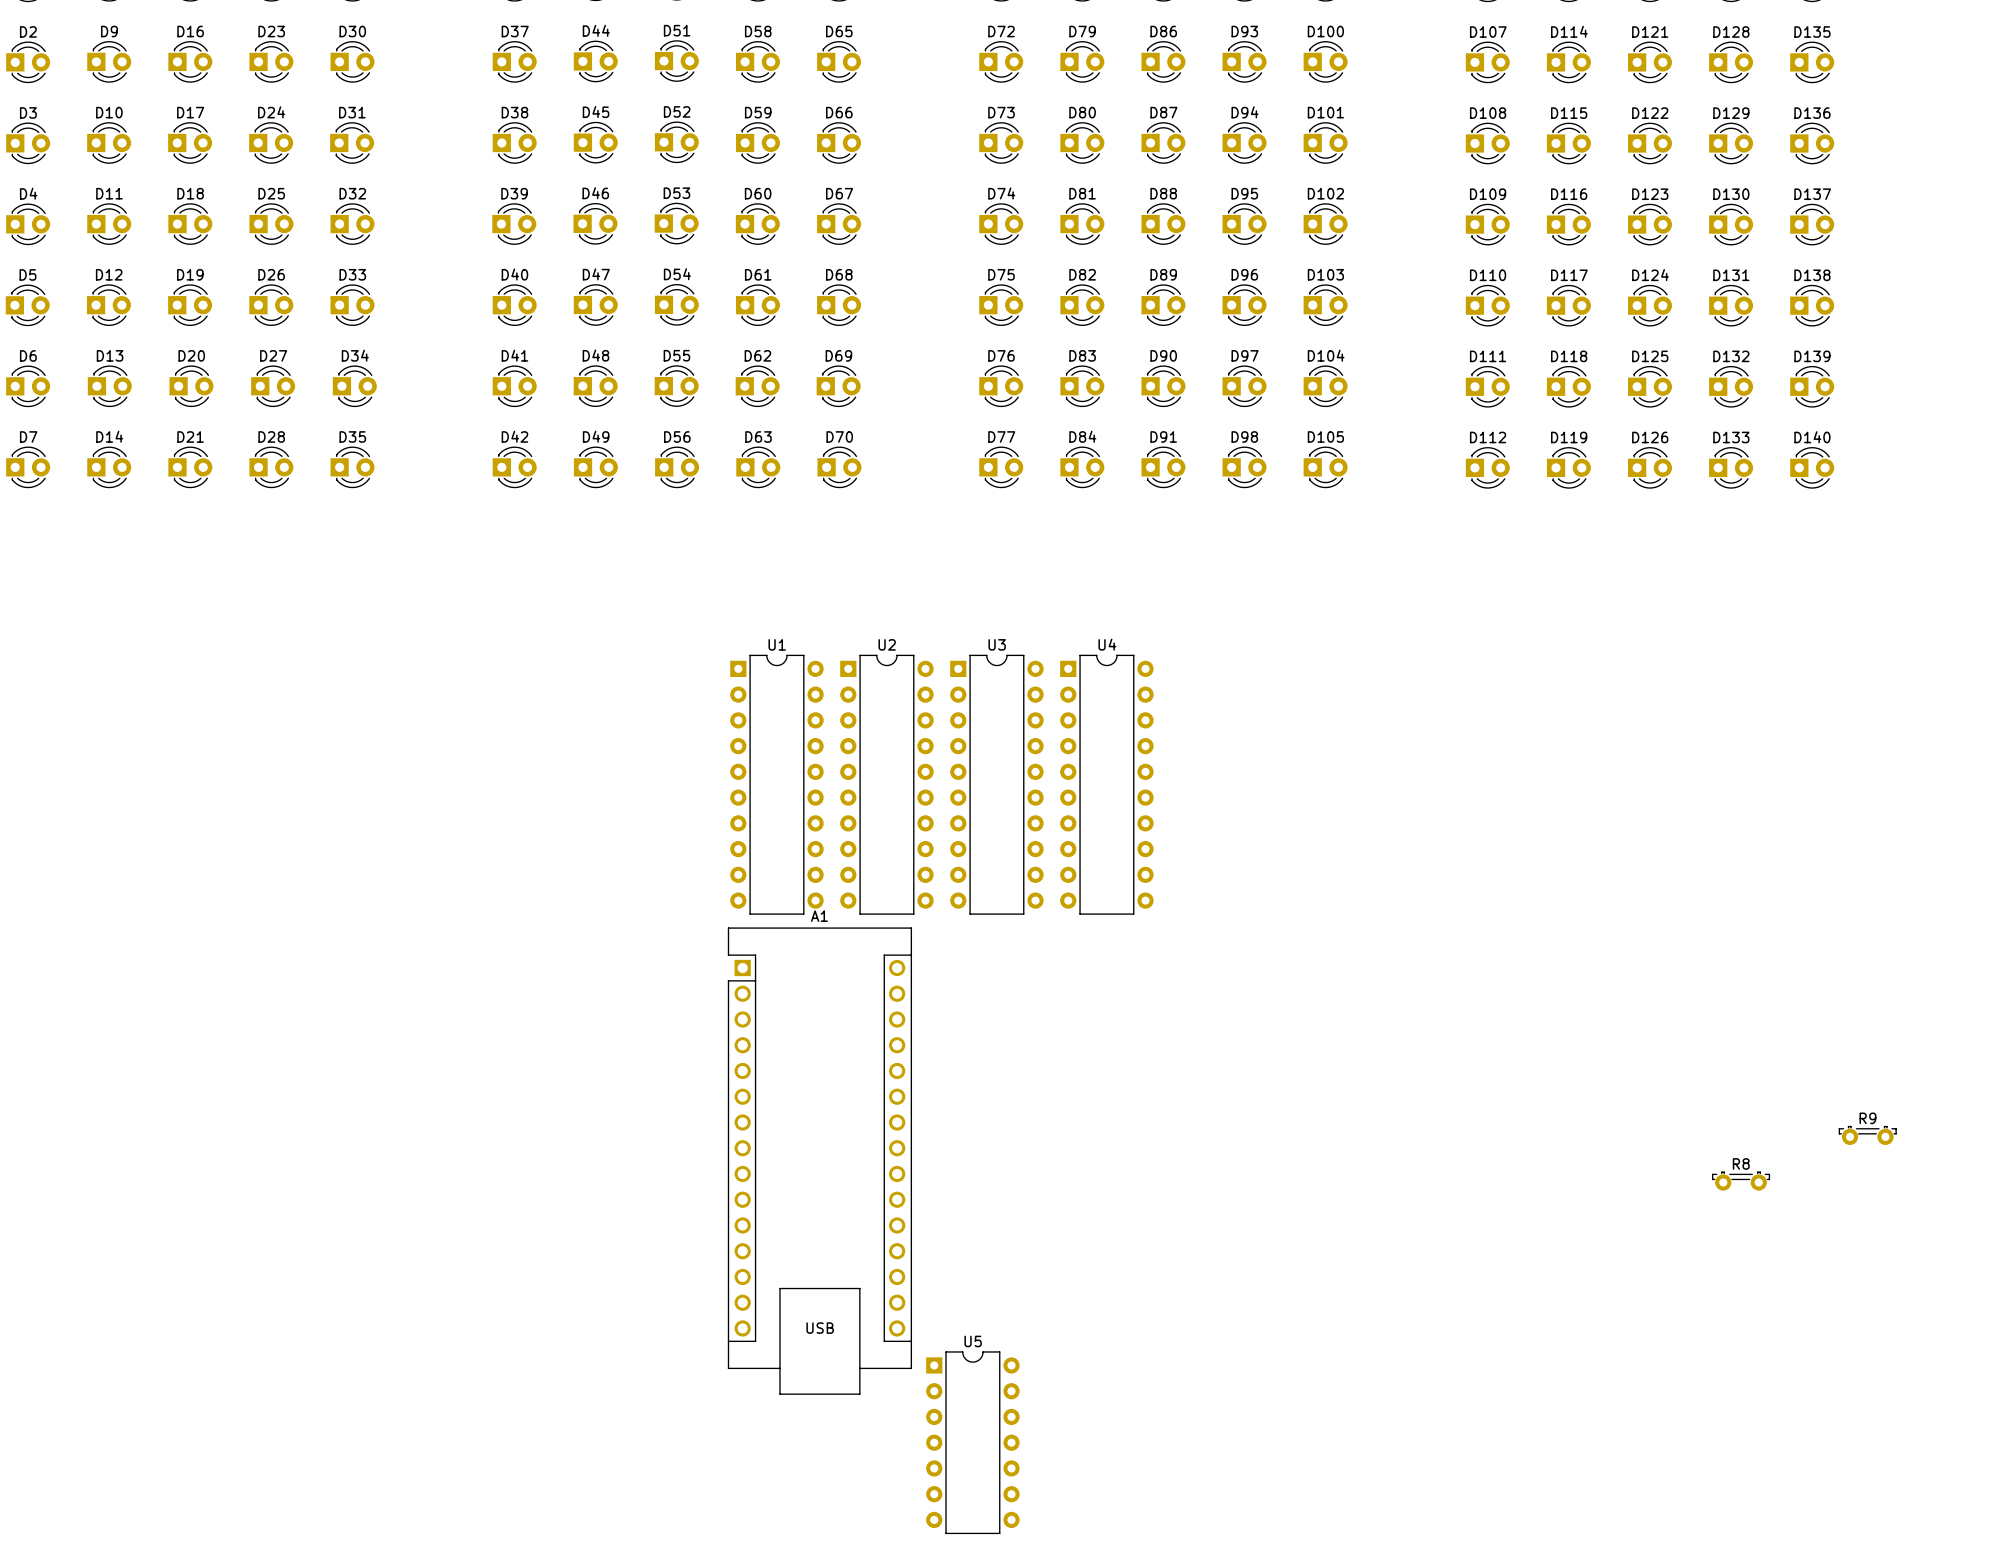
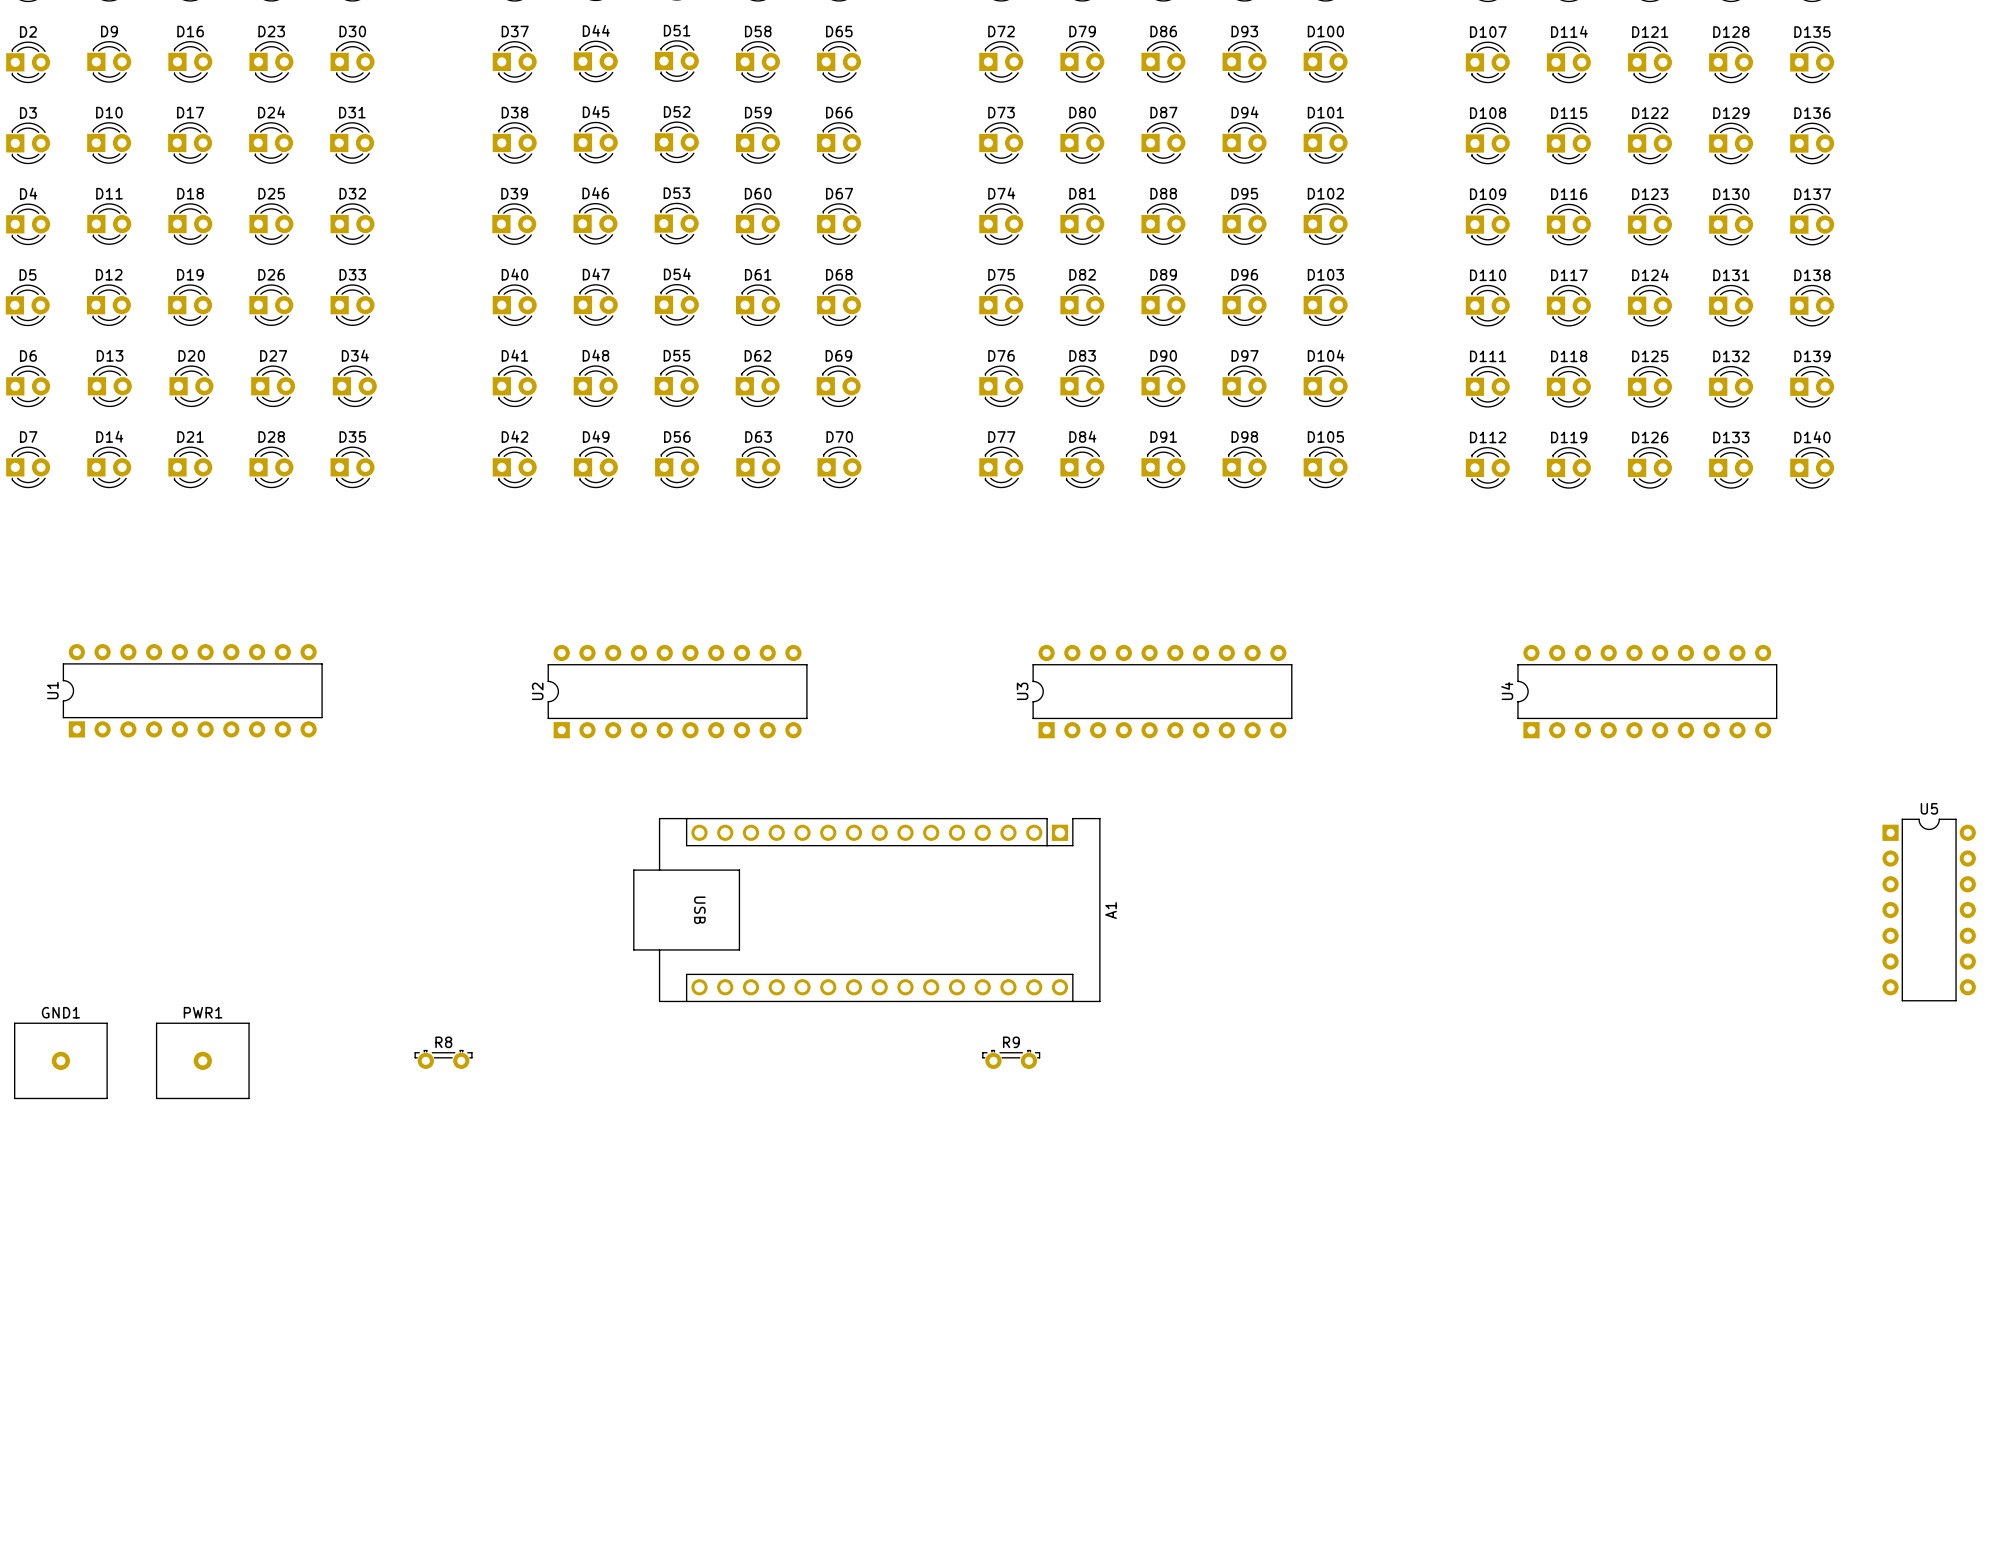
U1 rotation: 0° (776, 784) -> 90° counterclockwise (192, 690)
U1 position: (776, 784) -> (192, 690)
U2 rotation: 0° (886, 784) -> 90° counterclockwise (677, 691)
U2 position: (886, 784) -> (677, 691)
U3 rotation: 0° (996, 784) -> 90° counterclockwise (1162, 691)
U3 position: (996, 784) -> (1162, 691)
U4 rotation: 0° (1106, 784) -> 90° counterclockwise (1647, 691)
U4 position: (1106, 784) -> (1647, 691)
GND1: none -> (60, 1060)
PWR1: none -> (202, 1060)
R9 position: (1867, 1135) -> (1011, 1059)
A1 rotation: 0° (819, 1161) -> 90° clockwise (866, 910)
R8 position: (1741, 1181) -> (443, 1059)
U5 position: (972, 1442) -> (1929, 910)

